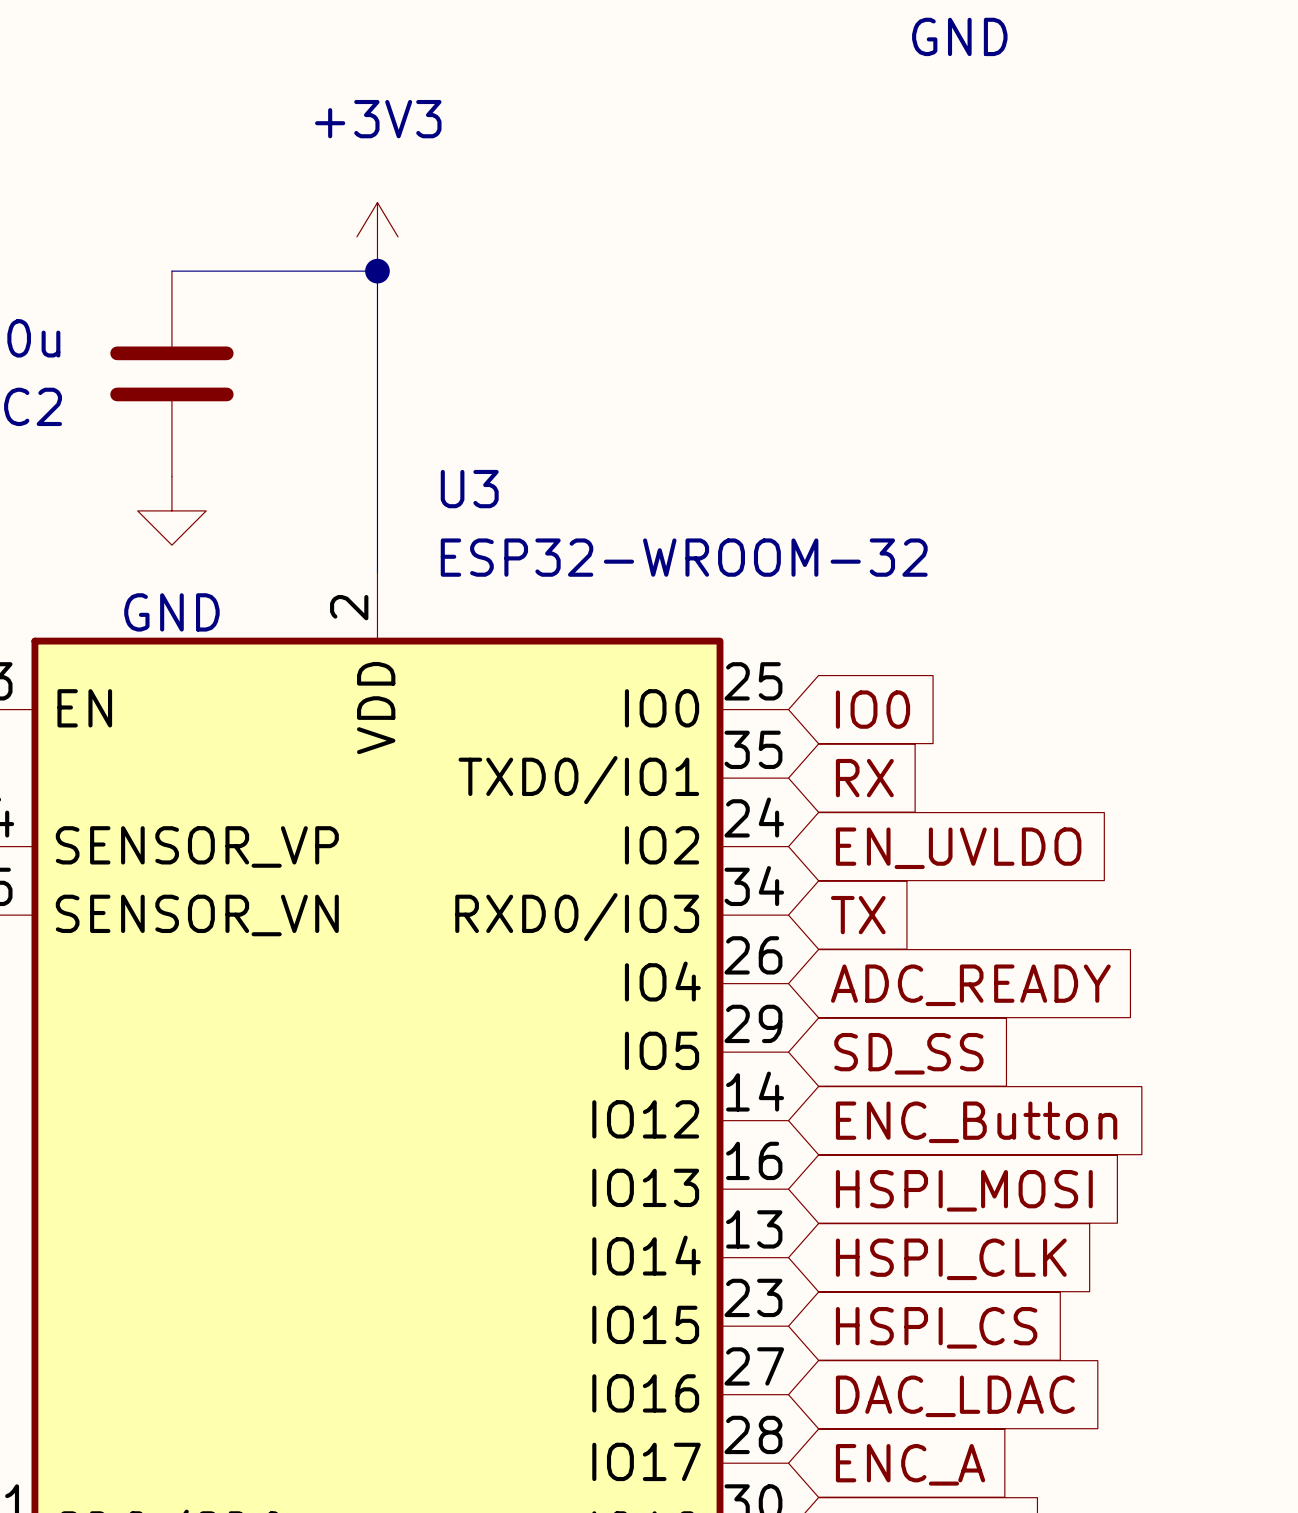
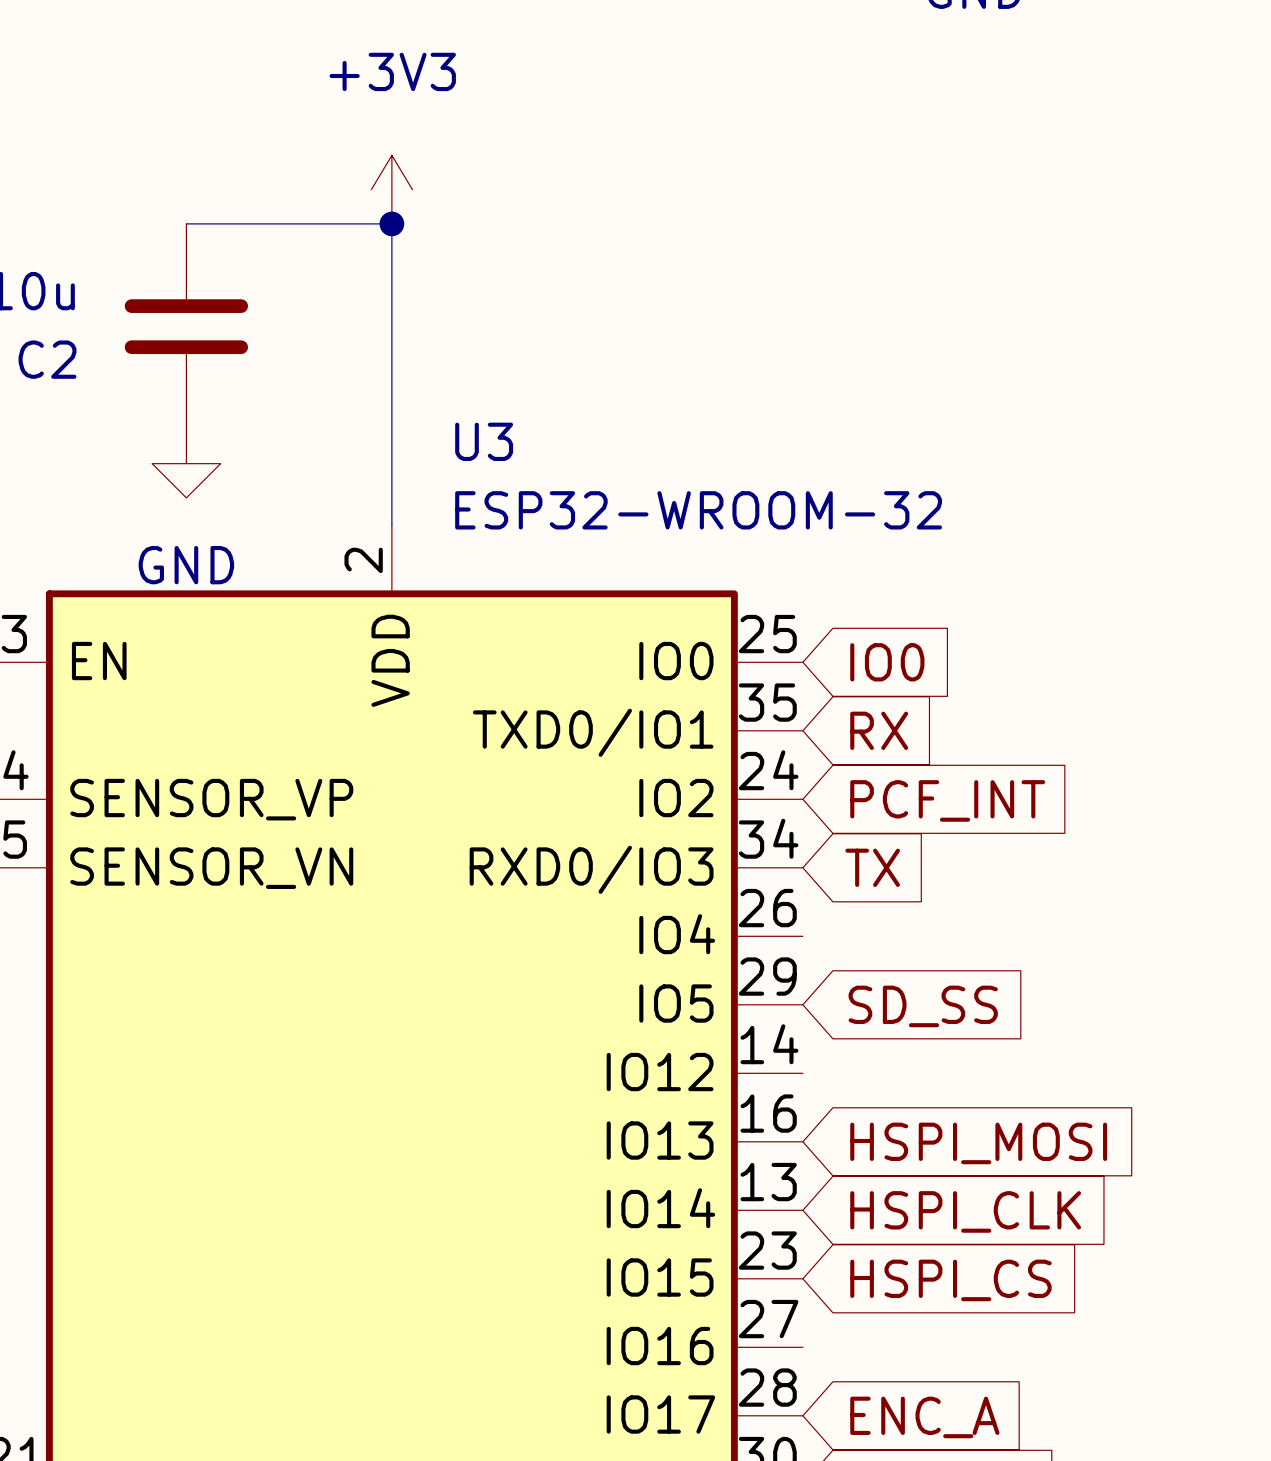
global label: EN_UVLDO (958, 848) -> PCF_INT (947, 800)
global label: ADC_READY (970, 985) -> none
global label: ENC_Button (976, 1122) -> none
global label: DAC_LDAC (955, 1396) -> none

